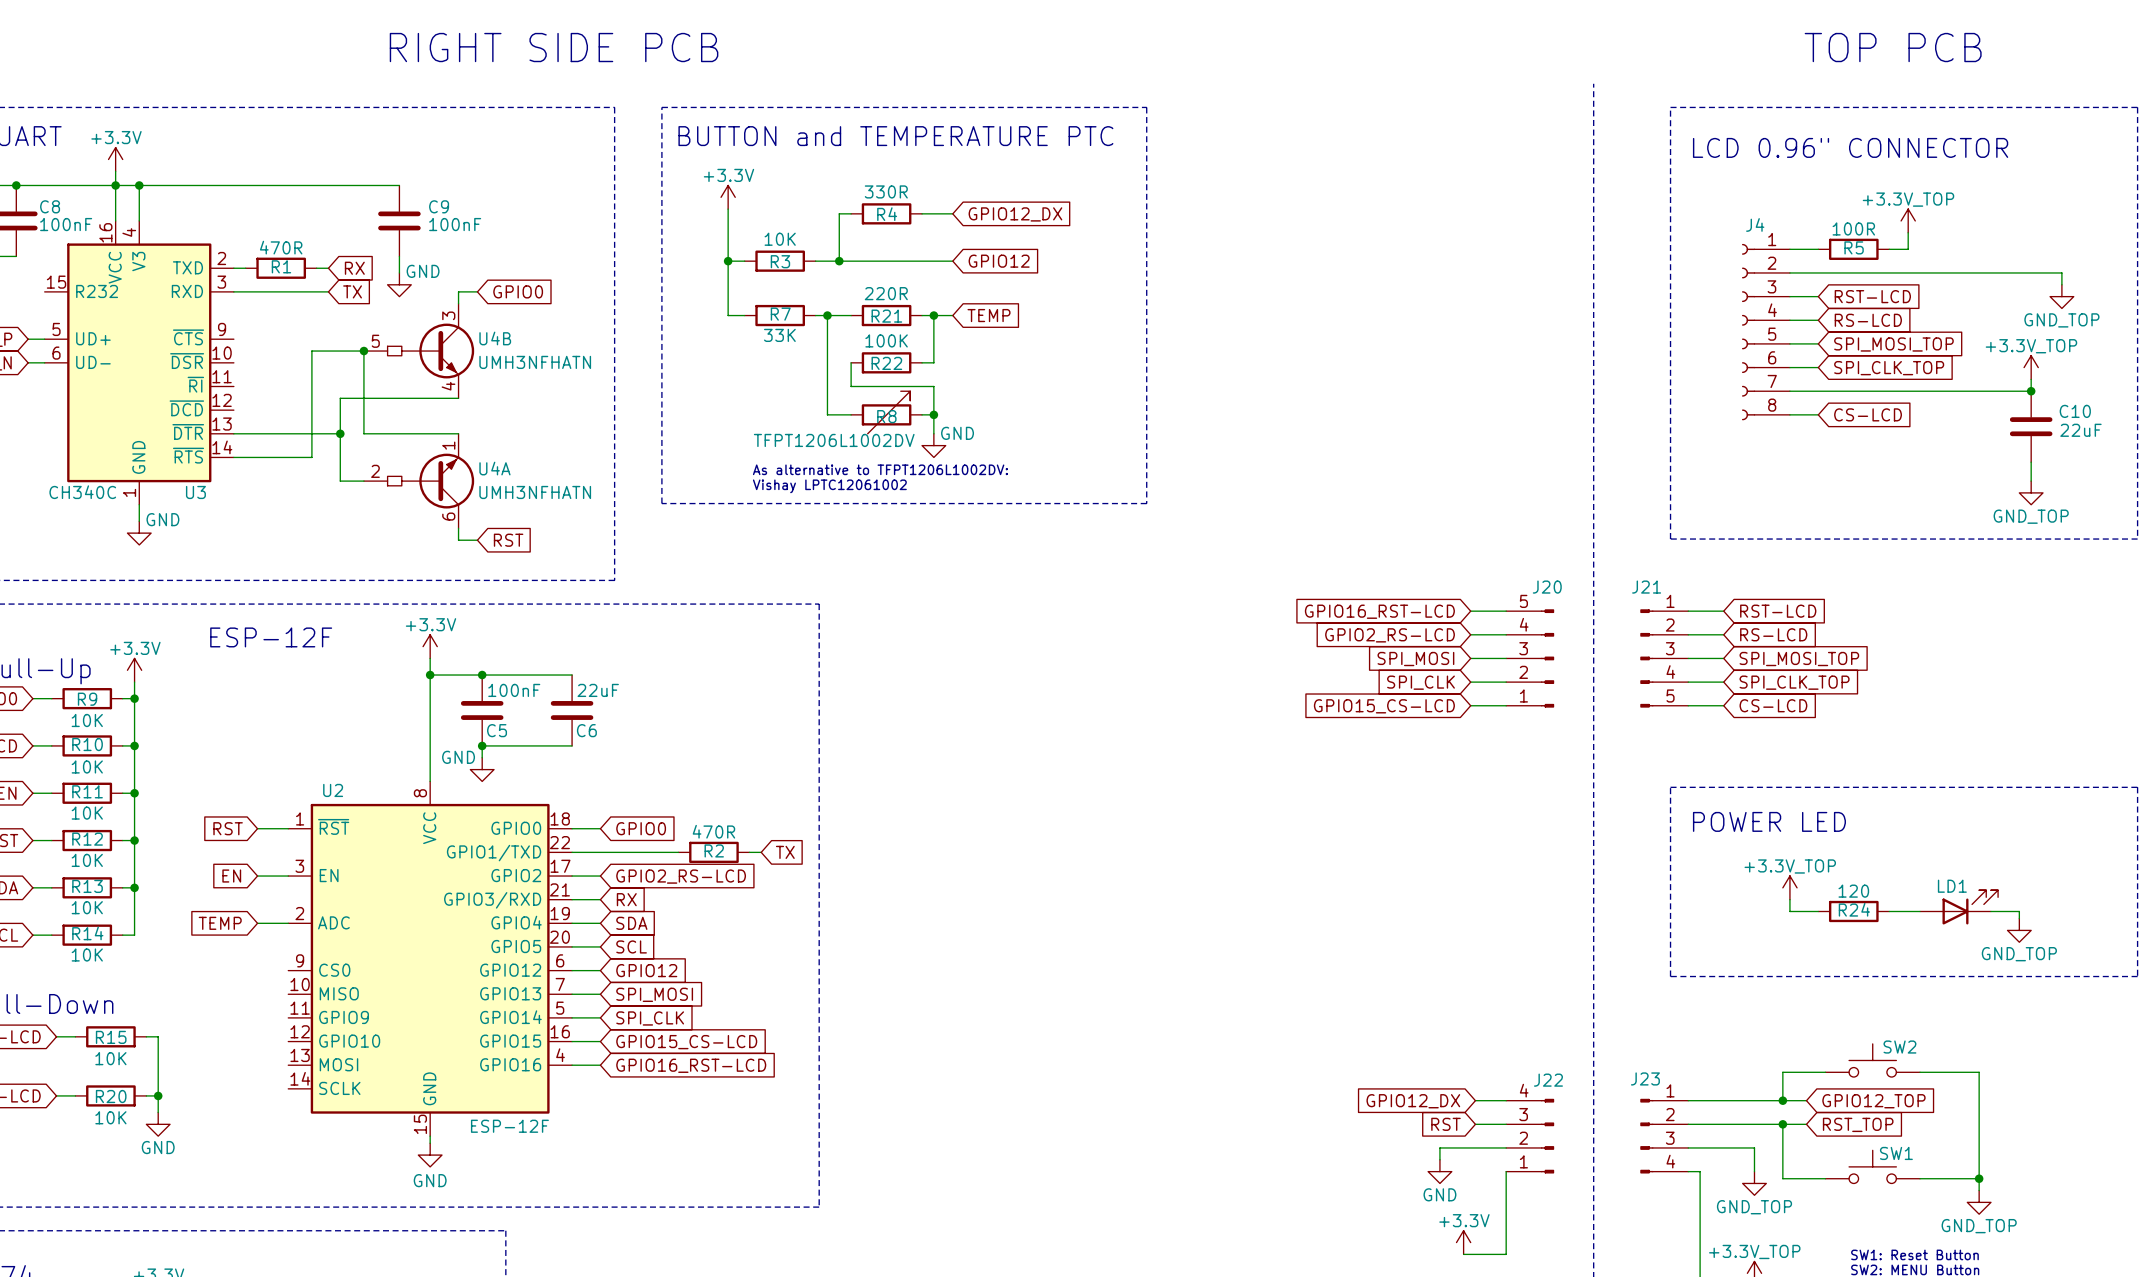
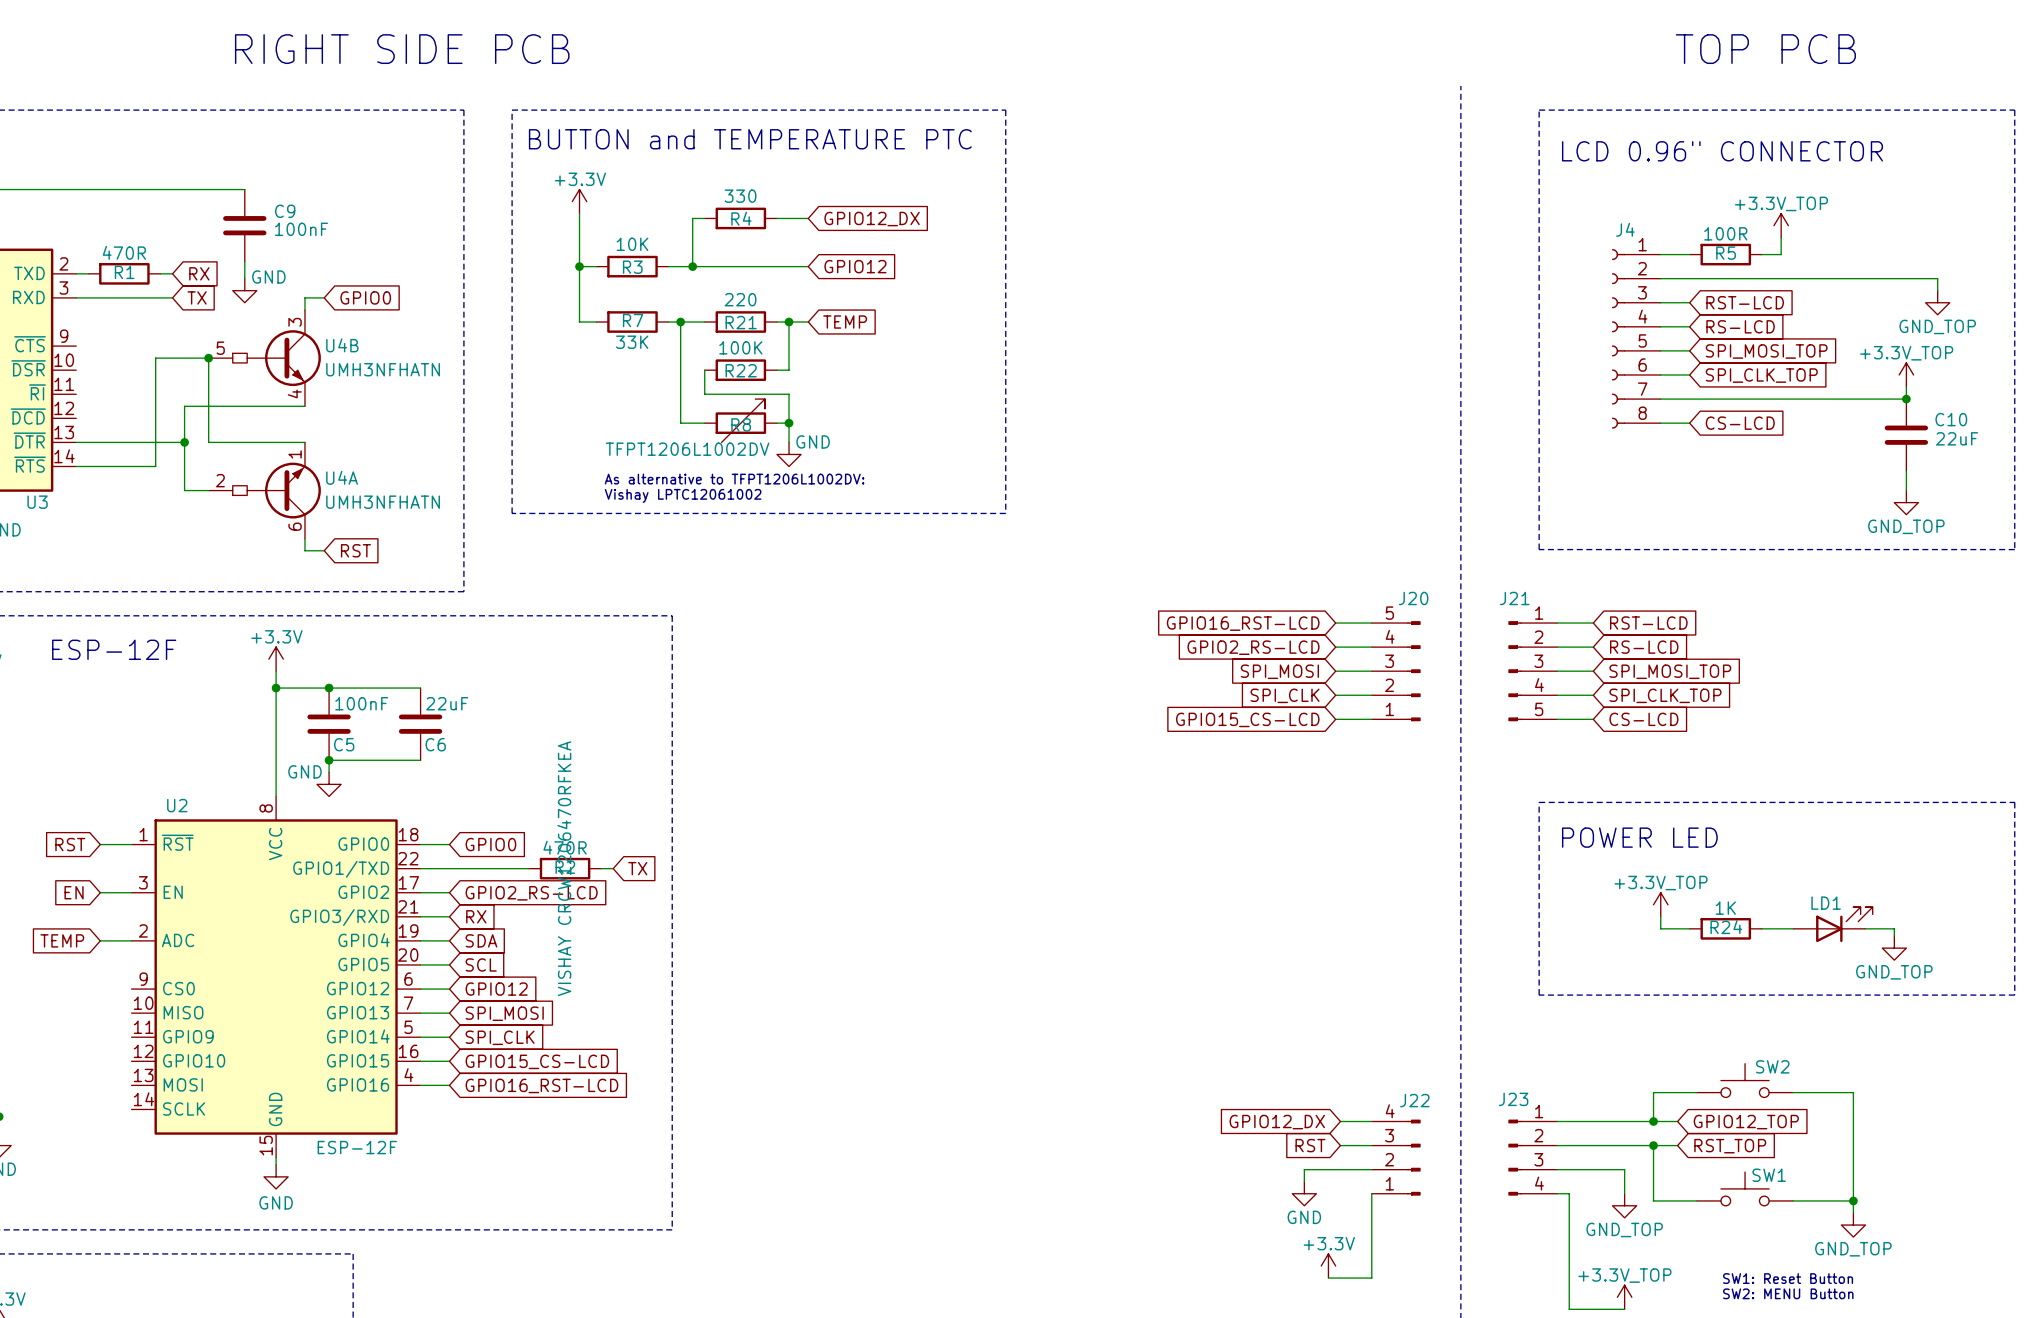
R4 value: 330R (886, 191) -> 330 (740, 196)
R21 value: 220R (886, 293) -> 220 (740, 299)
R2 text: none -> VISHAY CRCW1206470RFKEA (564, 868)
R24 value: 120 (1853, 891) -> 1K (1725, 908)

